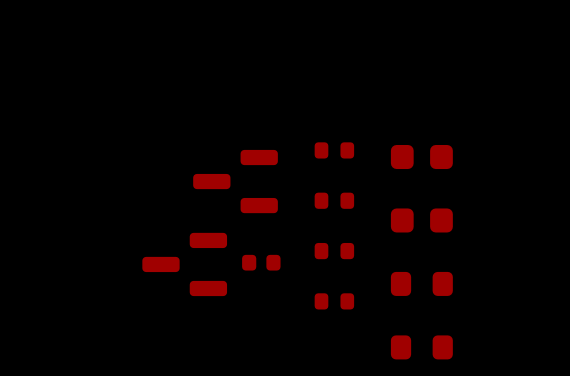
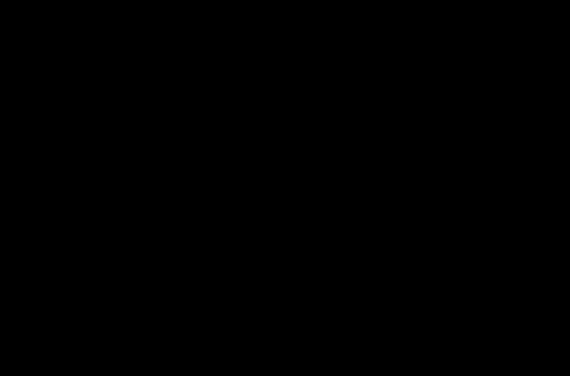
part: (334, 150) -> none
part: (421, 157) -> none
part: (235, 181) -> none
part: (334, 200) -> none
part: (421, 220) -> none
part: (334, 251) -> none
part: (261, 262) -> none
part: (184, 264) -> none
part: (421, 283) -> none
part: (334, 301) -> none
part: (421, 347) -> none

